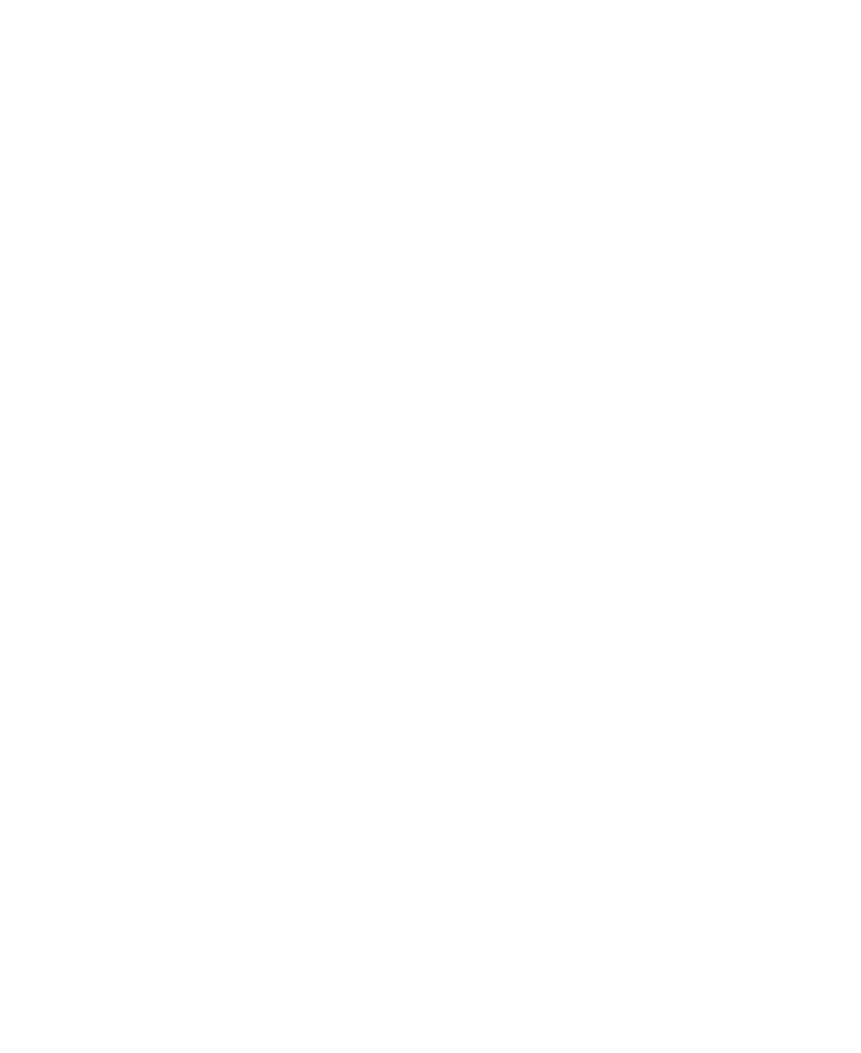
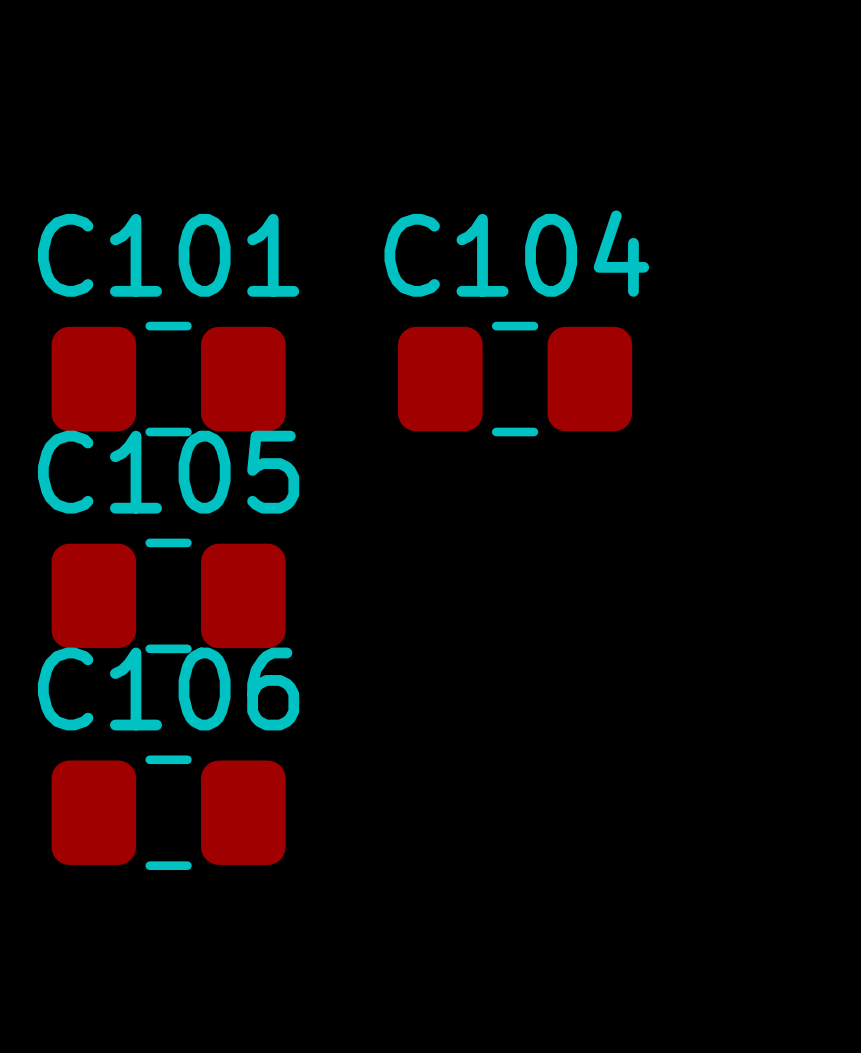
C101: none -> (168, 379)
C104: none -> (515, 379)
C105: none -> (168, 595)
C106: none -> (168, 812)

